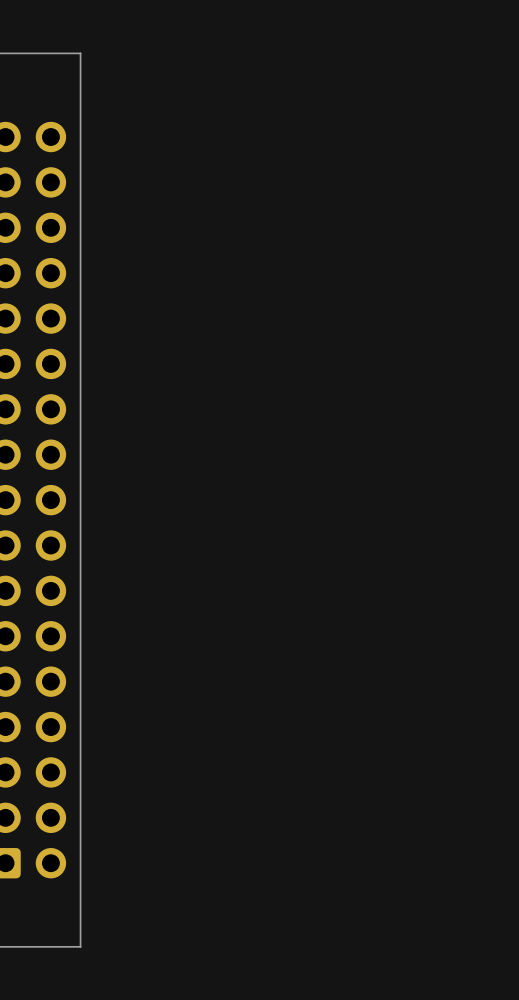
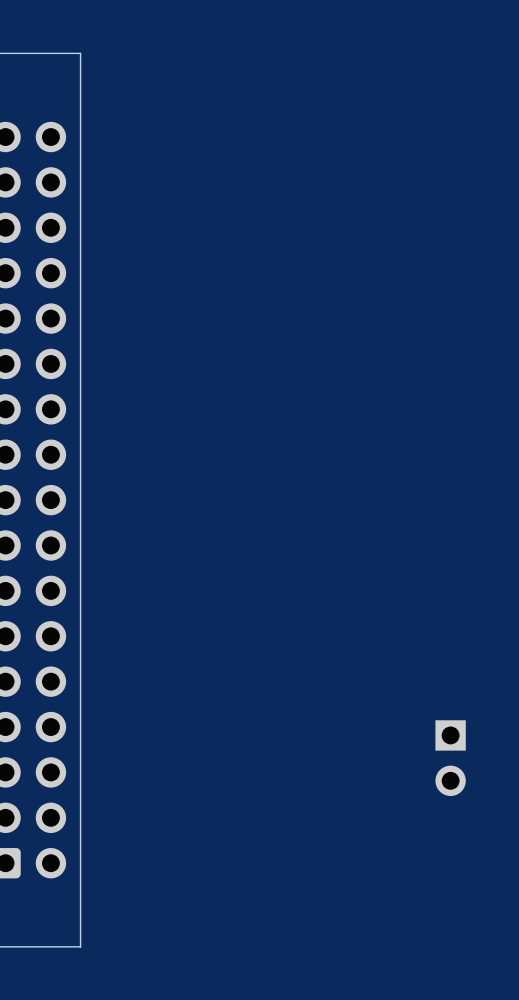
part: none -> (450, 758)

